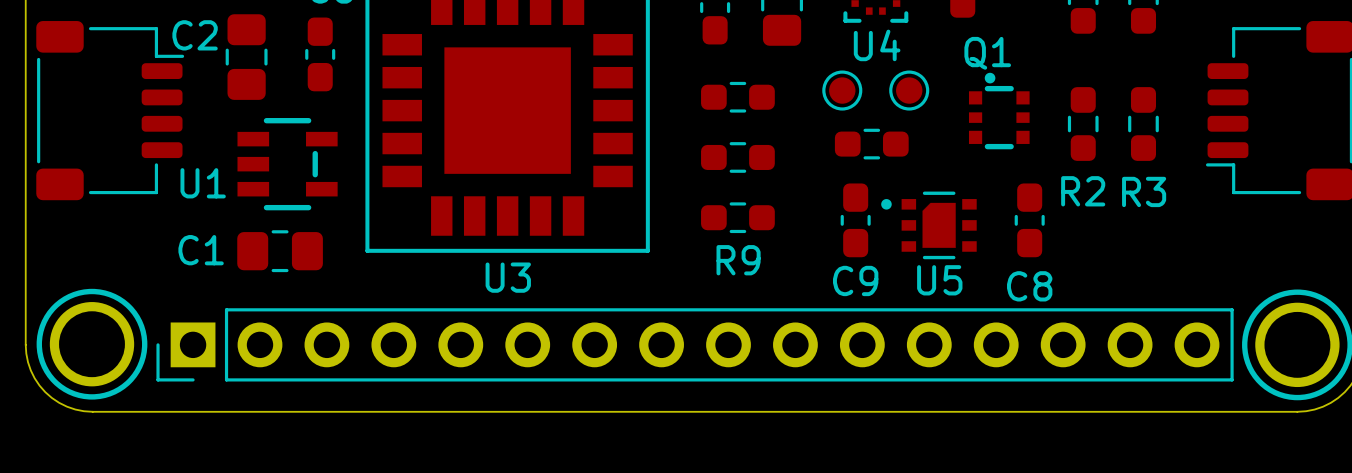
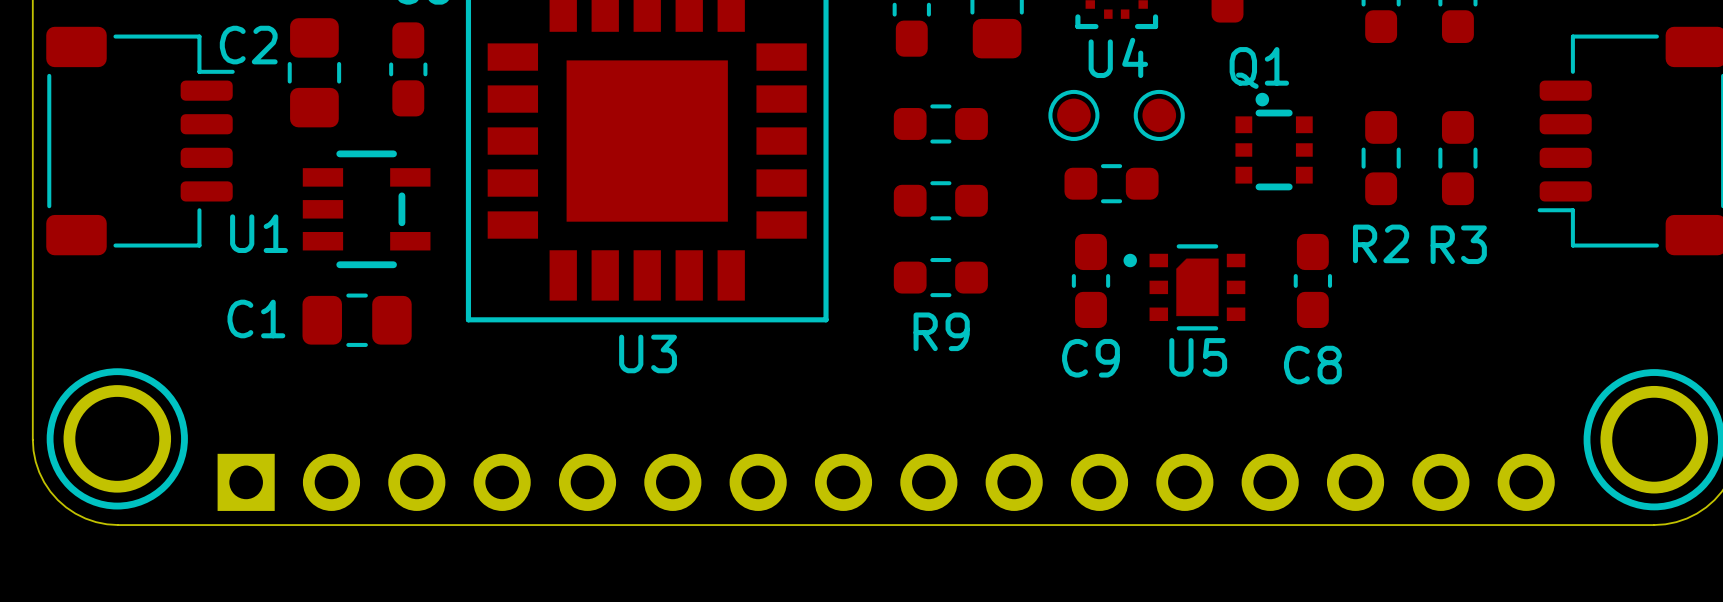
part: (695, 344) -> none
part: none -> (886, 482)

